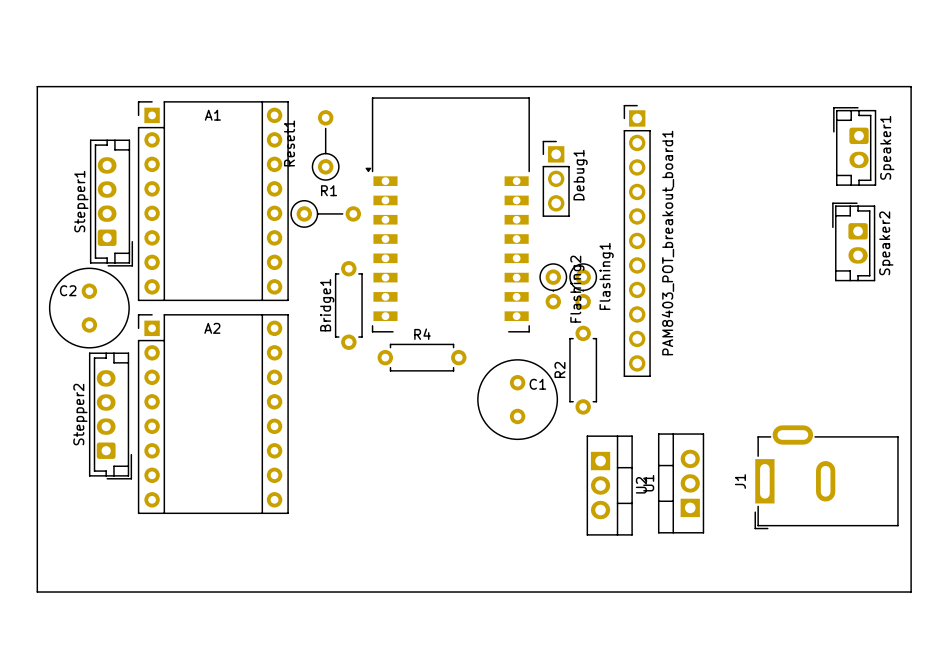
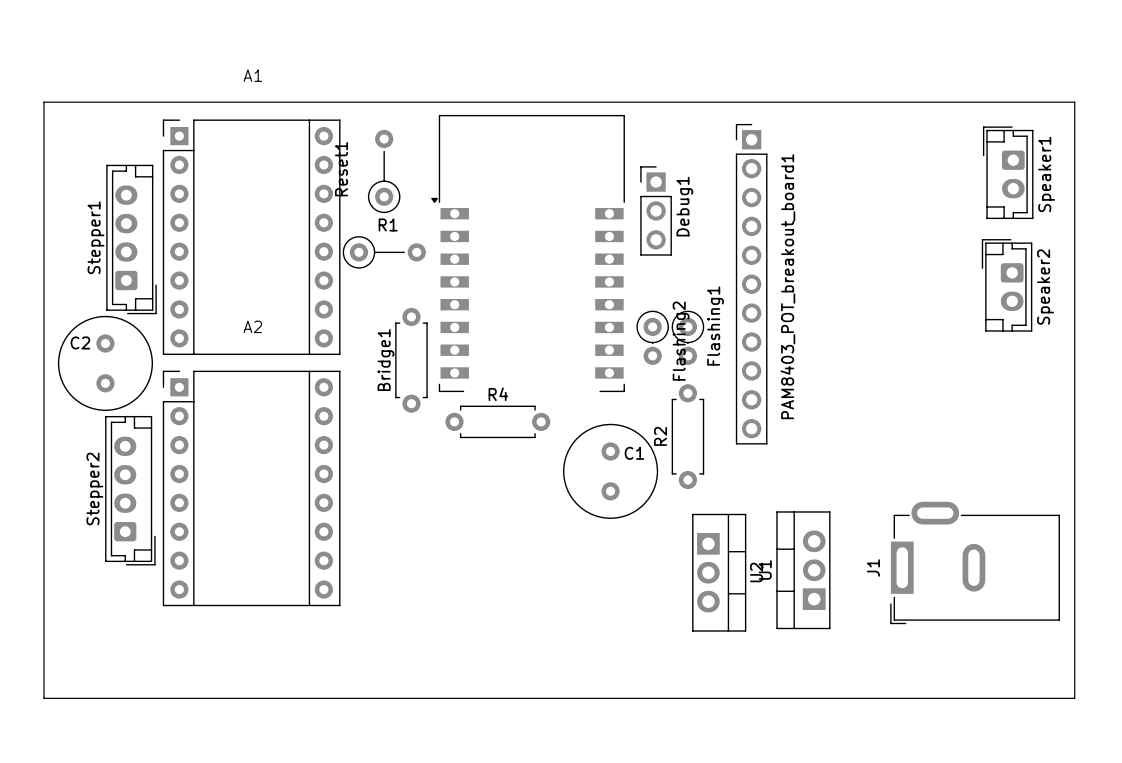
A1 name position: A1 (212, 115) -> A1 (252, 75)
A2 name position: A2 (212, 328) -> A2 (252, 326)

